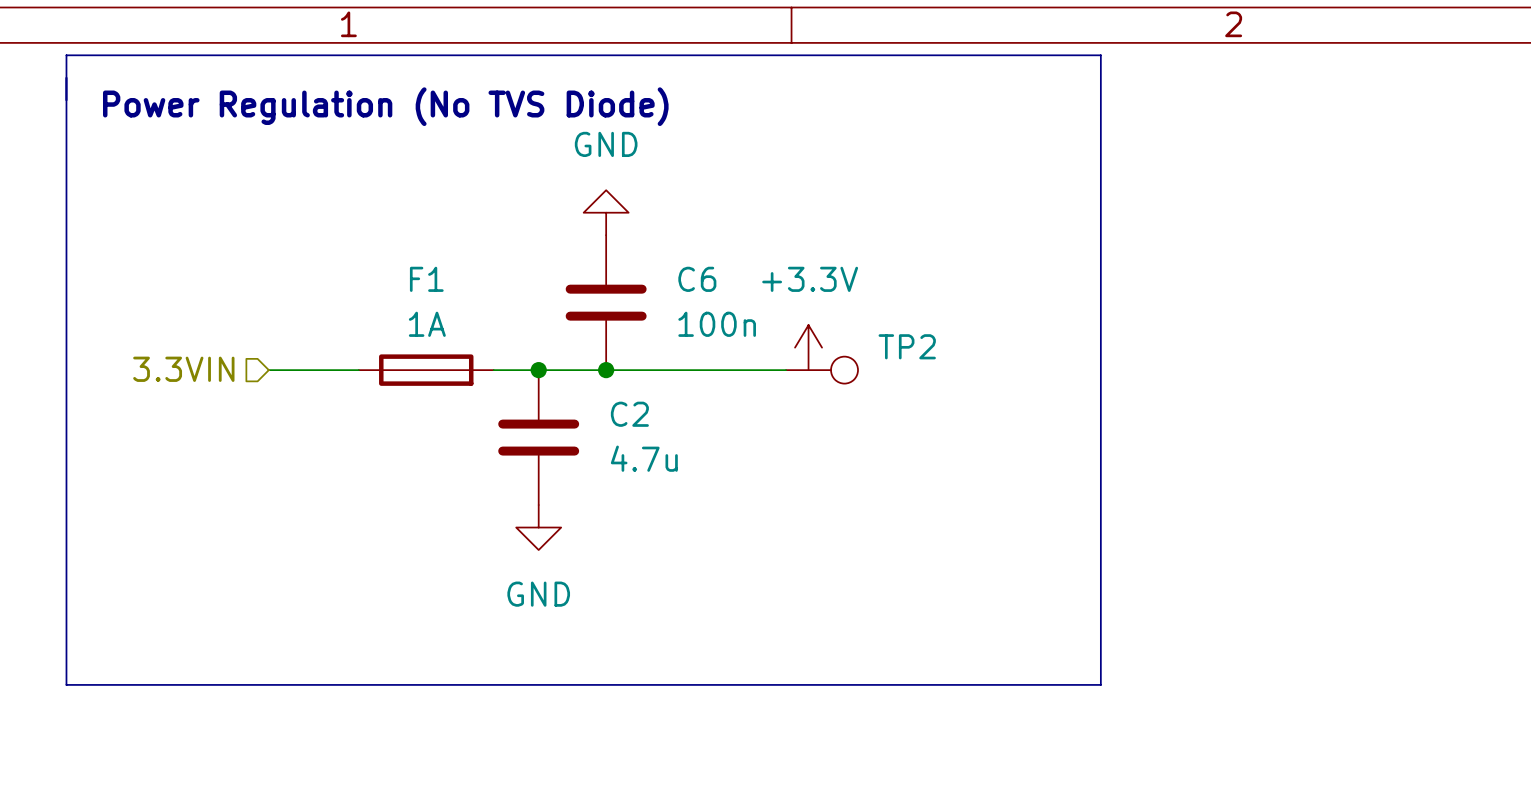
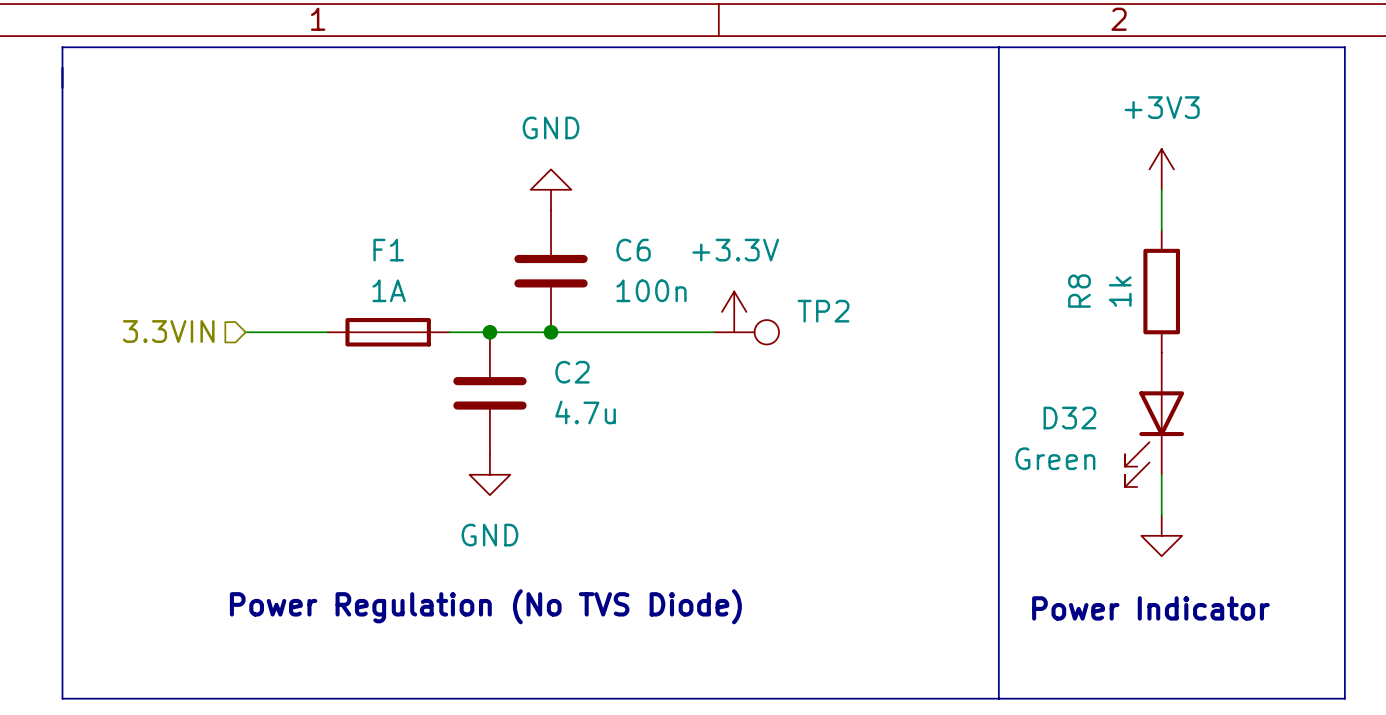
text: Power Regulation (No TVS Diode) (385, 106) -> none
power symbol: none -> +3V3 (1161, 169)
wire: none -> (1161, 189) (1161, 230)
R8: none -> 1k (1161, 291)
D32: none -> Green (1154, 419)
wire: none -> (1161, 474) (1161, 515)
power symbol: none -> (1161, 535)
text: none -> Power Regulation (No TVS Diode) (485, 606)
text: none -> Power Indicator (1150, 608)
line: (66, 684) (1100, 684) -> (62, 617) (62, 698) (1344, 698) (1344, 47) (998, 47)
line: none -> (998, 617) (998, 698)

